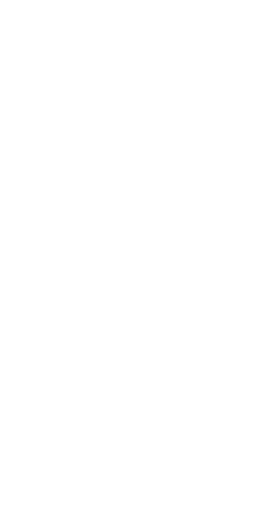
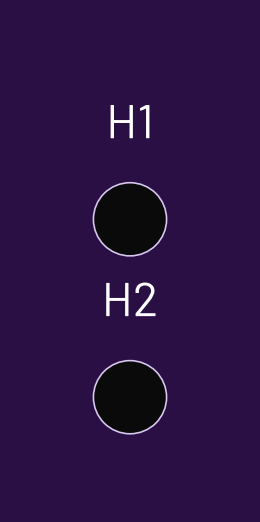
H1: none -> (130, 219)
H2: none -> (130, 397)

